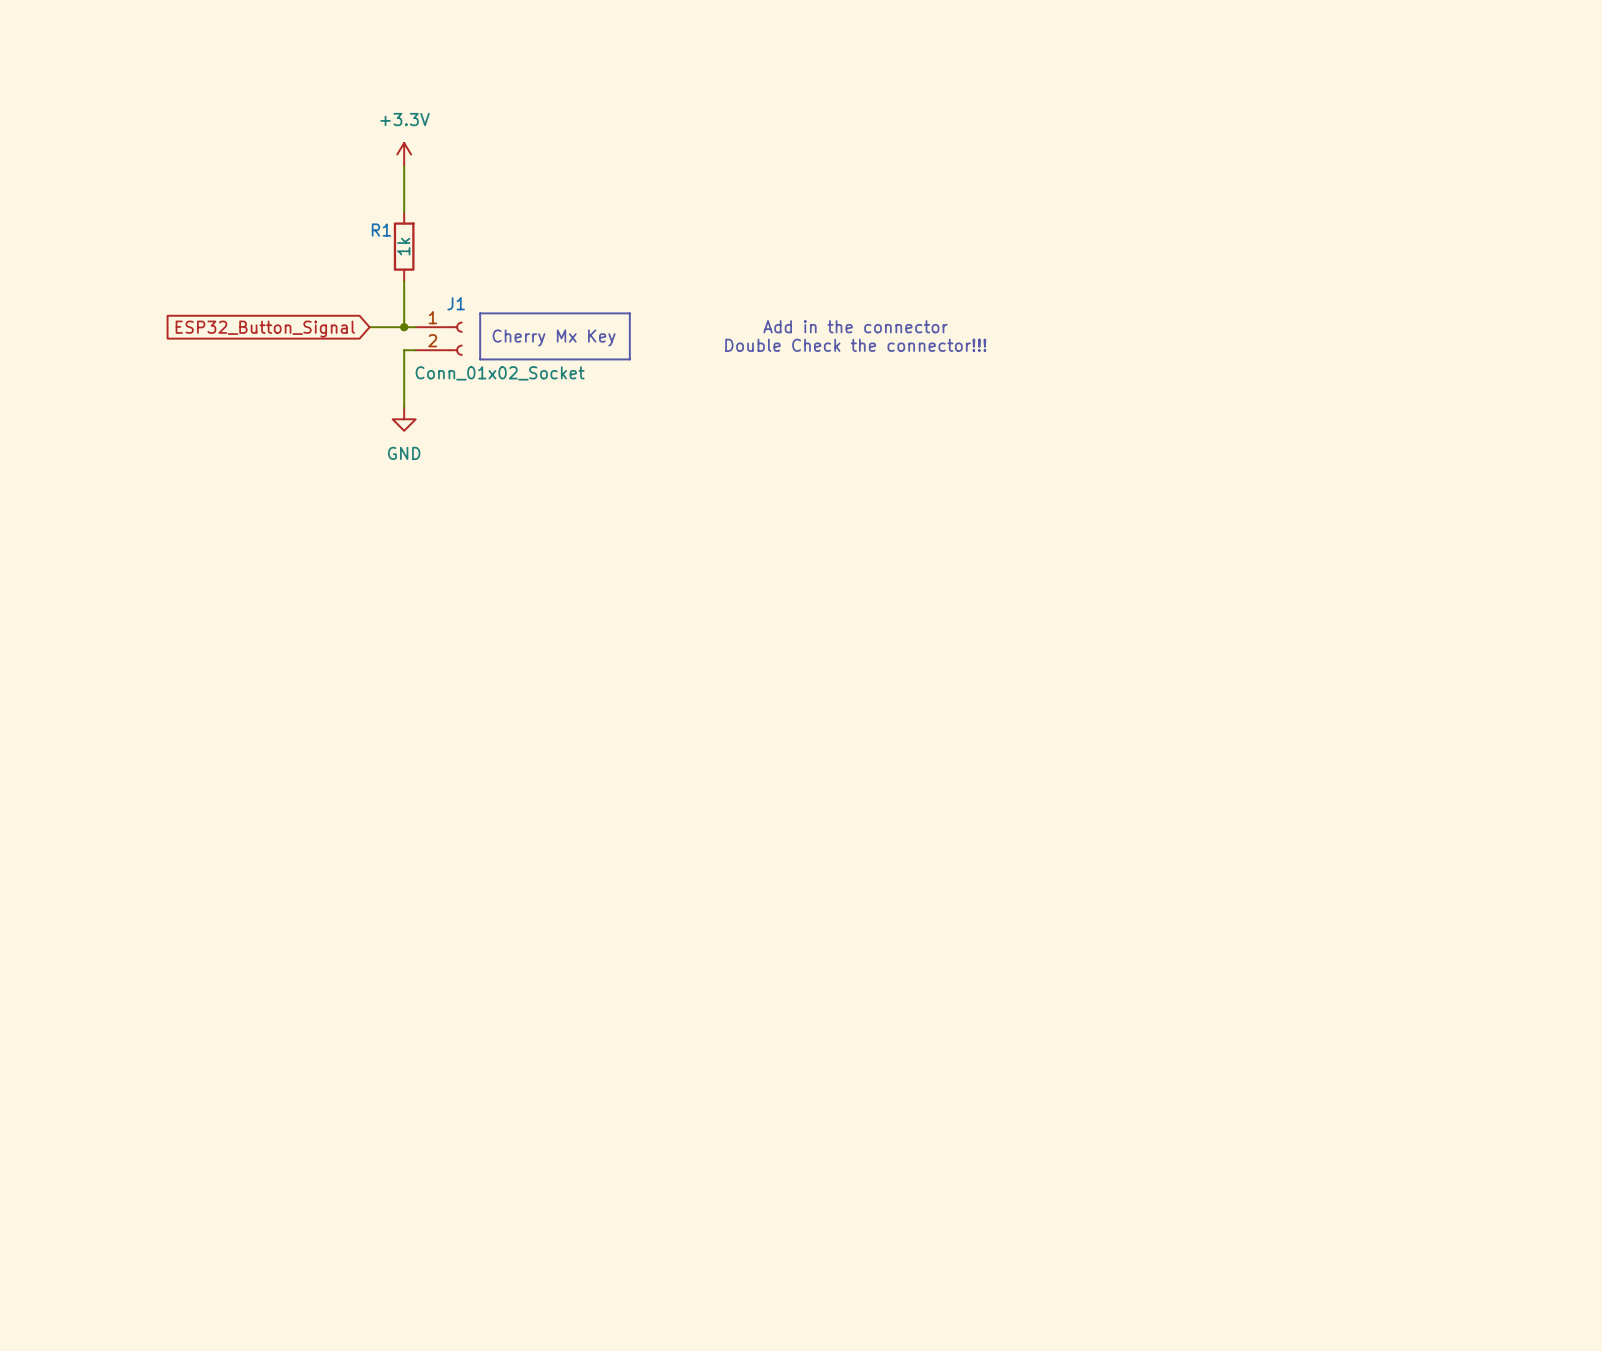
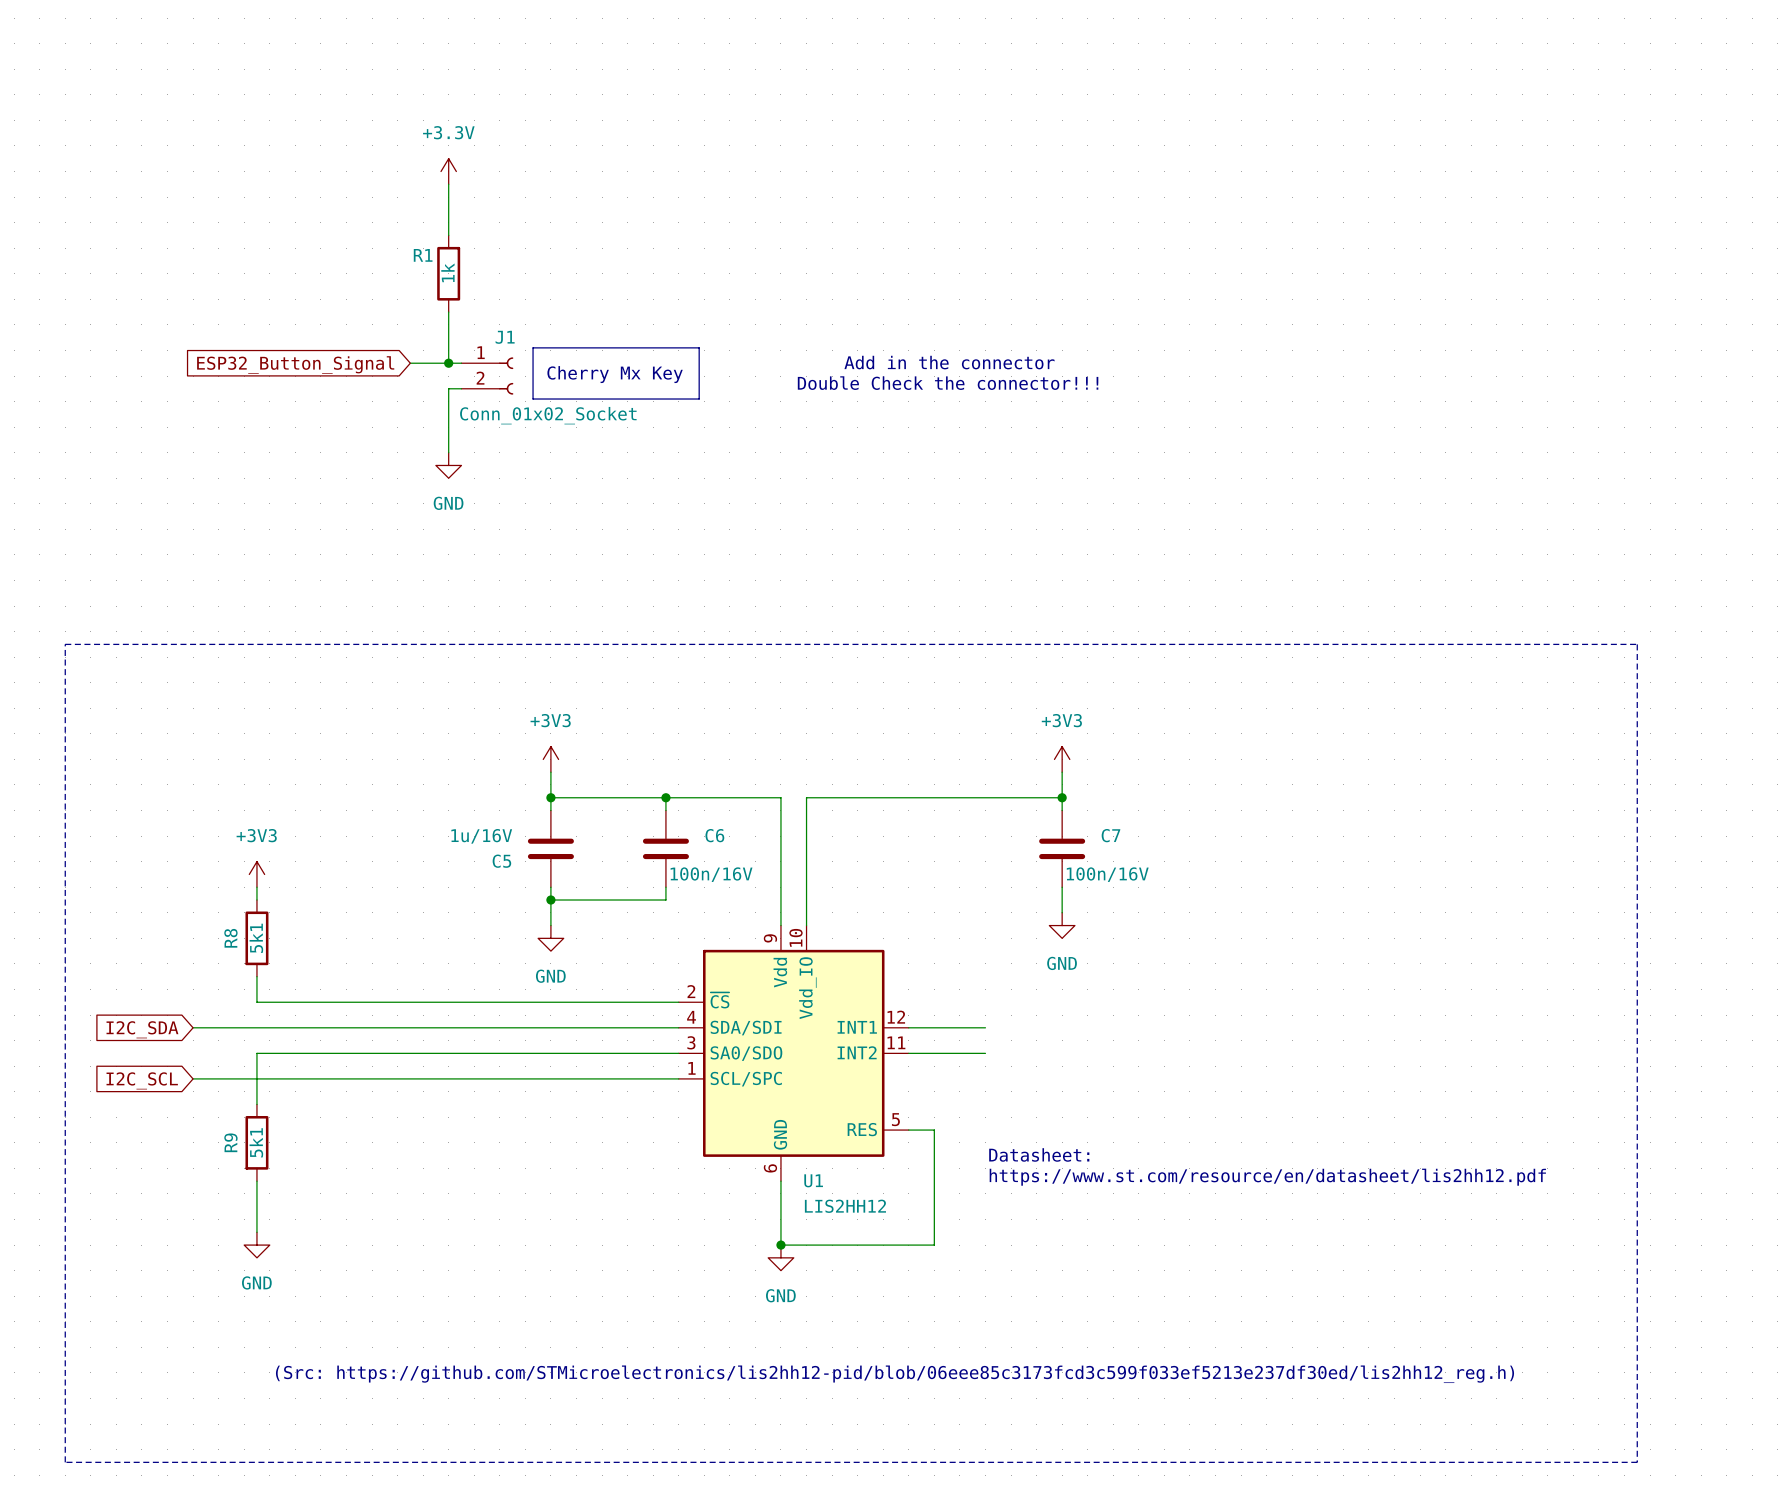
line: none -> (65, 644) (1637, 644) (1637, 1462) (65, 1462) (65, 644)
power symbol: none -> +3V3 (550, 759)
power symbol: none -> +3V3 (1062, 759)
wire: none -> (550, 772) (550, 810)
wire: none -> (1062, 772) (1062, 810)
wire: none -> (550, 797) (780, 797) (780, 925)
junction: none -> (550, 797)
wire: none -> (665, 797) (665, 810)
junction: none -> (665, 797)
wire: none -> (1062, 797) (806, 797) (806, 925)
junction: none -> (1062, 797)
C5: none -> 1u/16V (550, 848)
C6: none -> 100n/16V (665, 848)
C7: none -> 100n/16V (1062, 848)
power symbol: none -> +3V3 (256, 874)
wire: none -> (256, 887) (256, 900)
wire: none -> (550, 887) (550, 925)
wire: none -> (665, 887) (665, 900) (550, 900)
wire: none -> (1062, 887) (1062, 912)
junction: none -> (550, 900)
power symbol: none -> GND (1062, 925)
R8: none -> 5k1 (256, 938)
power symbol: none -> GND (550, 938)
wire: none -> (256, 976) (256, 1002) (678, 1002)
wire: none -> (193, 1027) (678, 1027)
wire: none -> (908, 1027) (985, 1027)
global label: none -> I2C_SDA (142, 1029)
wire: none -> (678, 1053) (256, 1053) (256, 1104)
U1: none -> LIS2HH12 (793, 1053)
wire: none -> (908, 1053) (985, 1053)
wire: none -> (193, 1078) (678, 1078)
global label: none -> I2C_SCL (142, 1080)
wire: none -> (908, 1130) (934, 1130) (934, 1245) (780, 1245) (780, 1181)
R9: none -> 5k1 (256, 1142)
text: none -> Datasheet: (1039, 1154)
text: none -> https://www.st.com/resource/en/datasheet/lis2hh12.pdf (1267, 1177)
wire: none -> (256, 1181) (256, 1232)
power symbol: none -> GND (256, 1245)
junction: none -> (780, 1245)
power symbol: none -> GND (780, 1257)
text: none -> (Src: https://github.com/STMicroelectronics/lis2hh12-pid/blob/06eee85c3173fcd3c599f033ef5213e237df30ed/lis2hh12_reg.h) (894, 1374)

